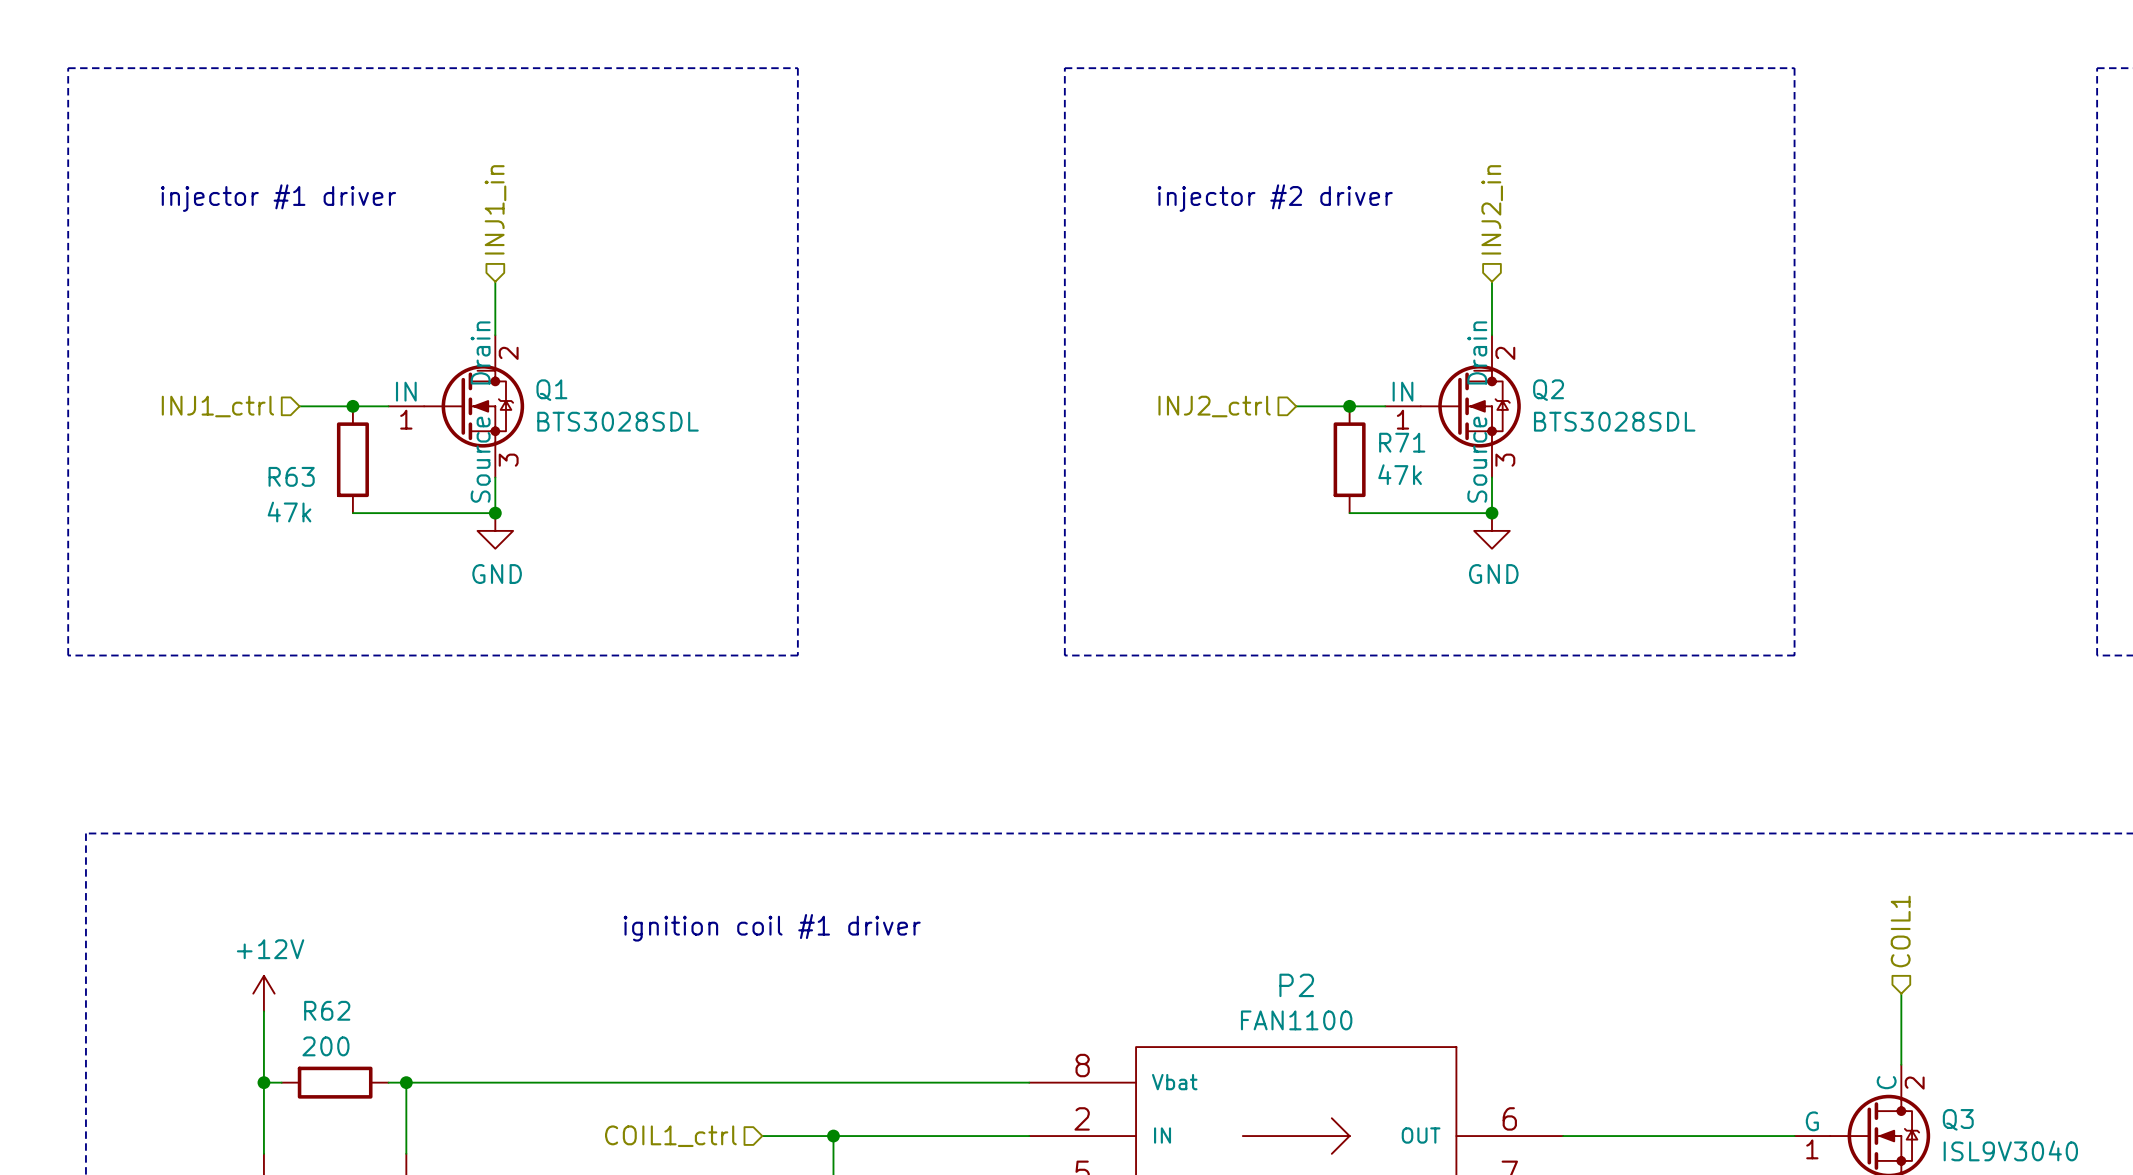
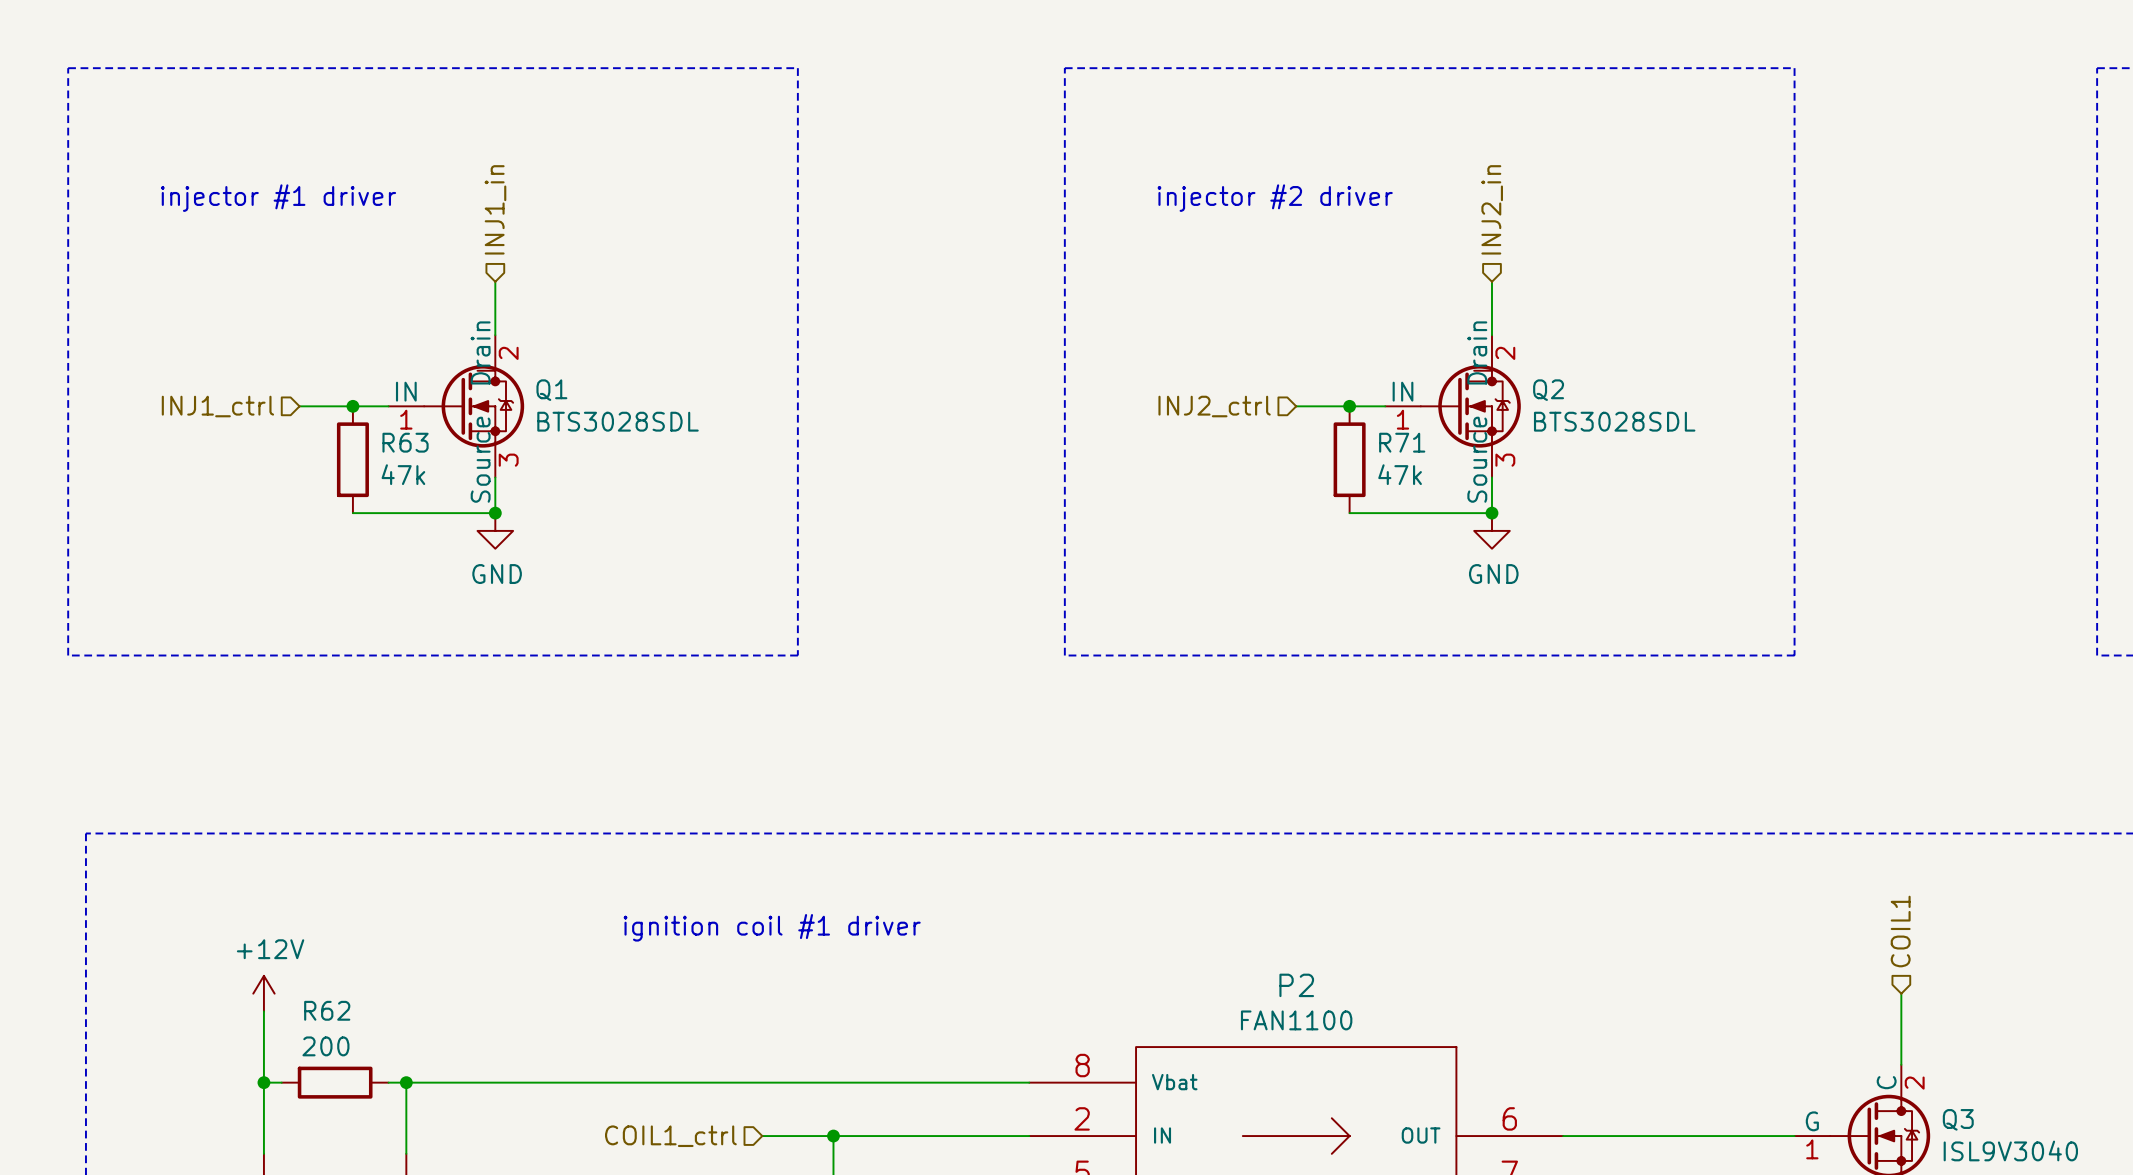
R63 name position: R63 (291, 476) -> R63 (405, 442)
R63 value position: 47k (289, 512) -> 47k (403, 474)

